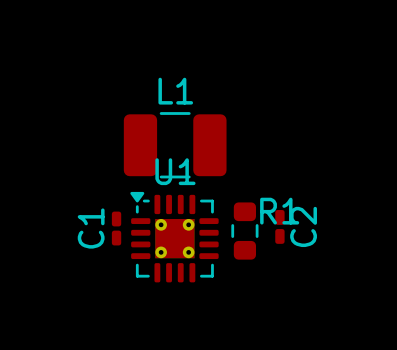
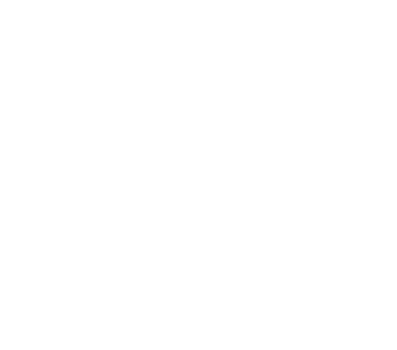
L1: (175, 145) -> none
C2: (279, 226) -> none
C1: (116, 228) -> none
R1: (244, 231) -> none
U1: (174, 237) -> none

